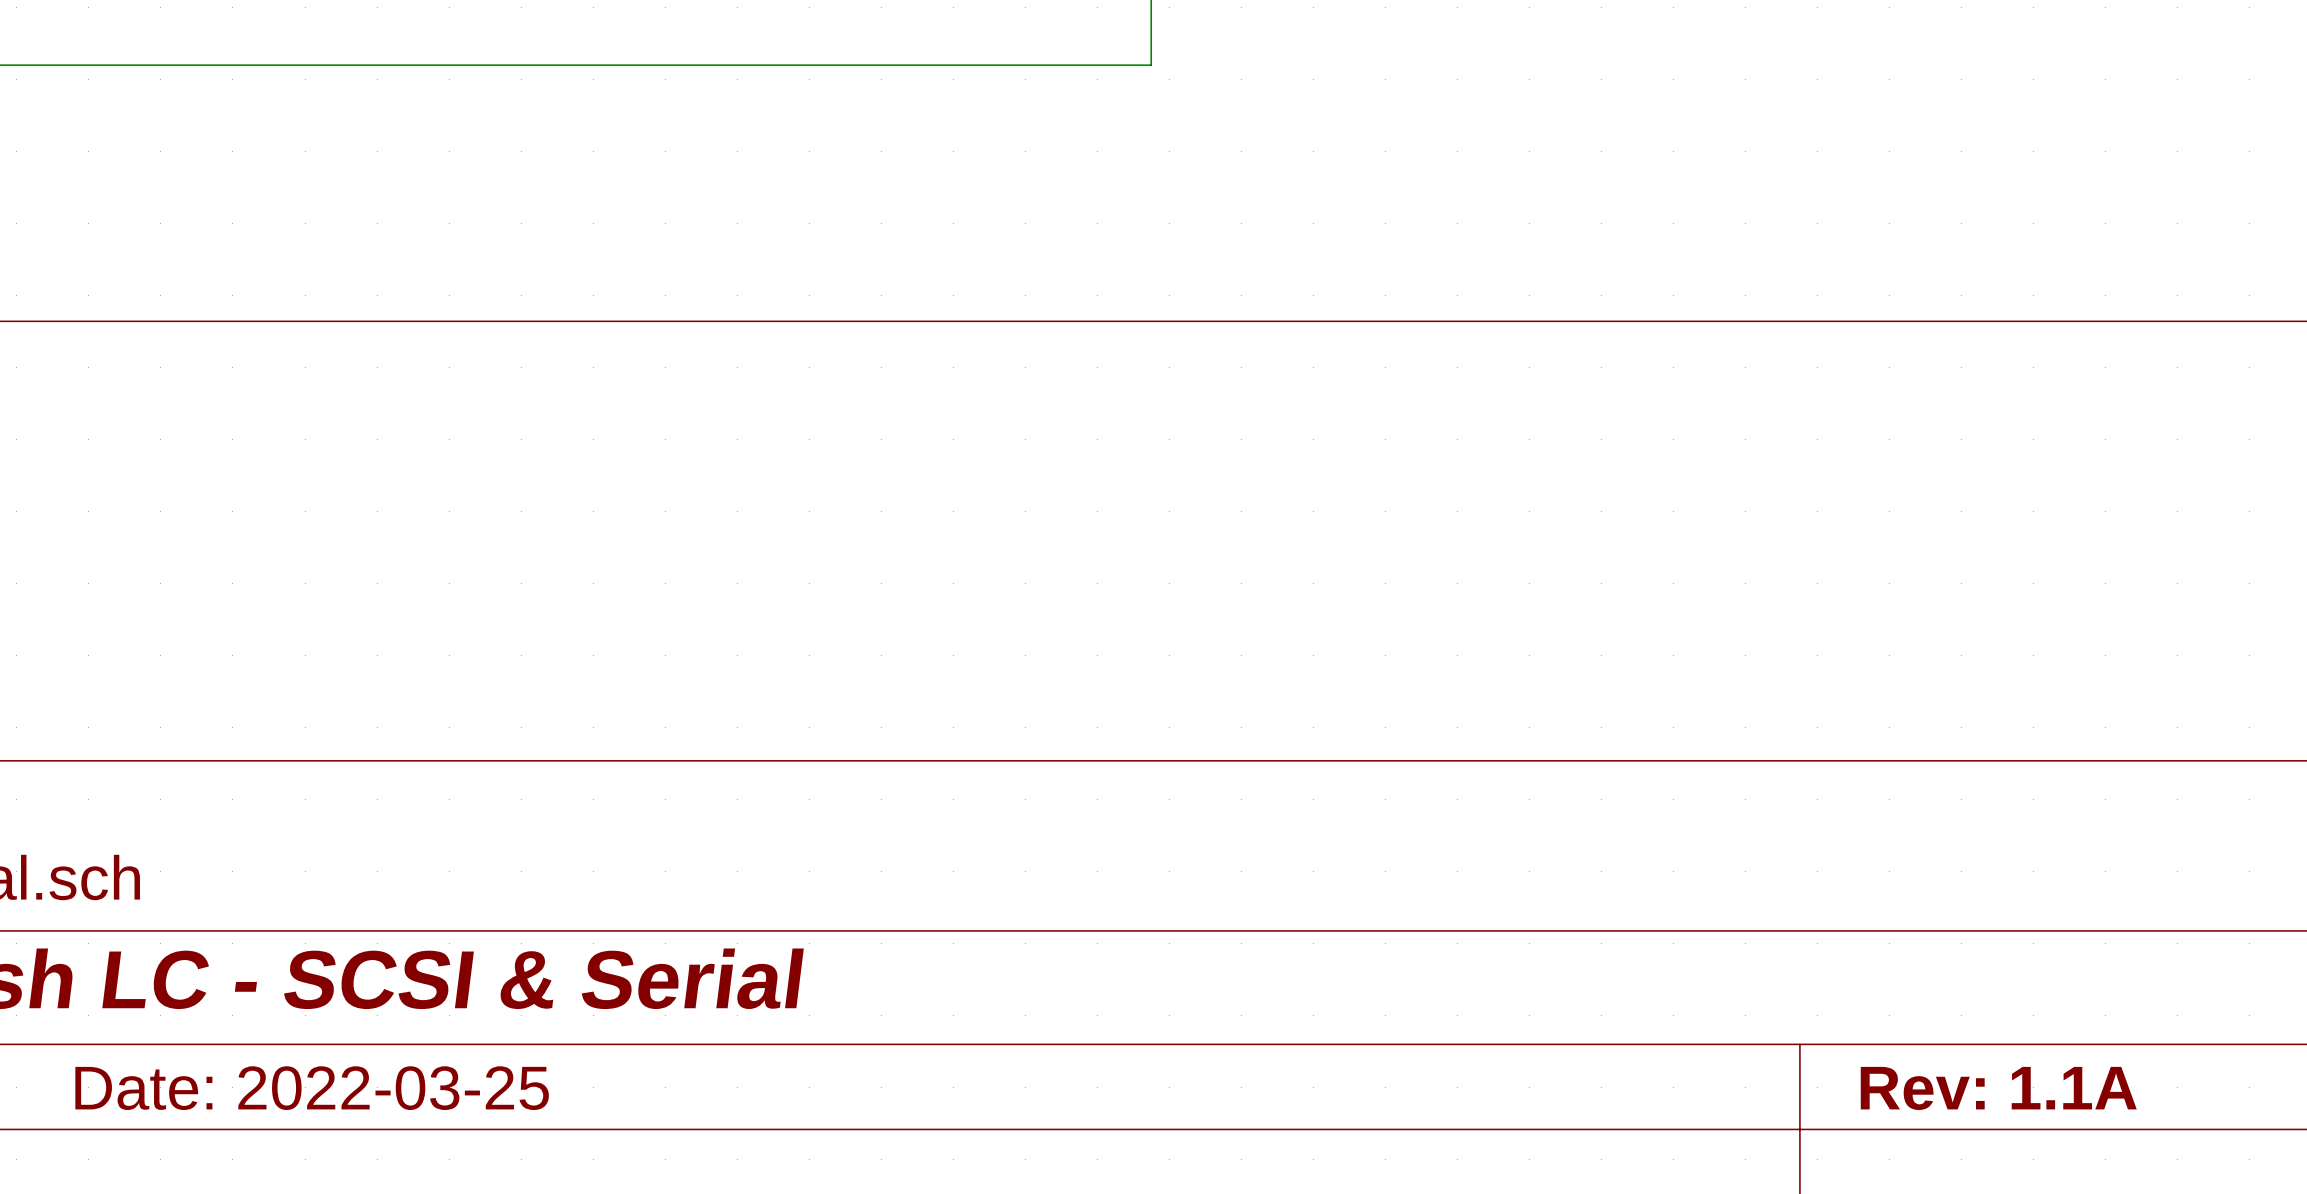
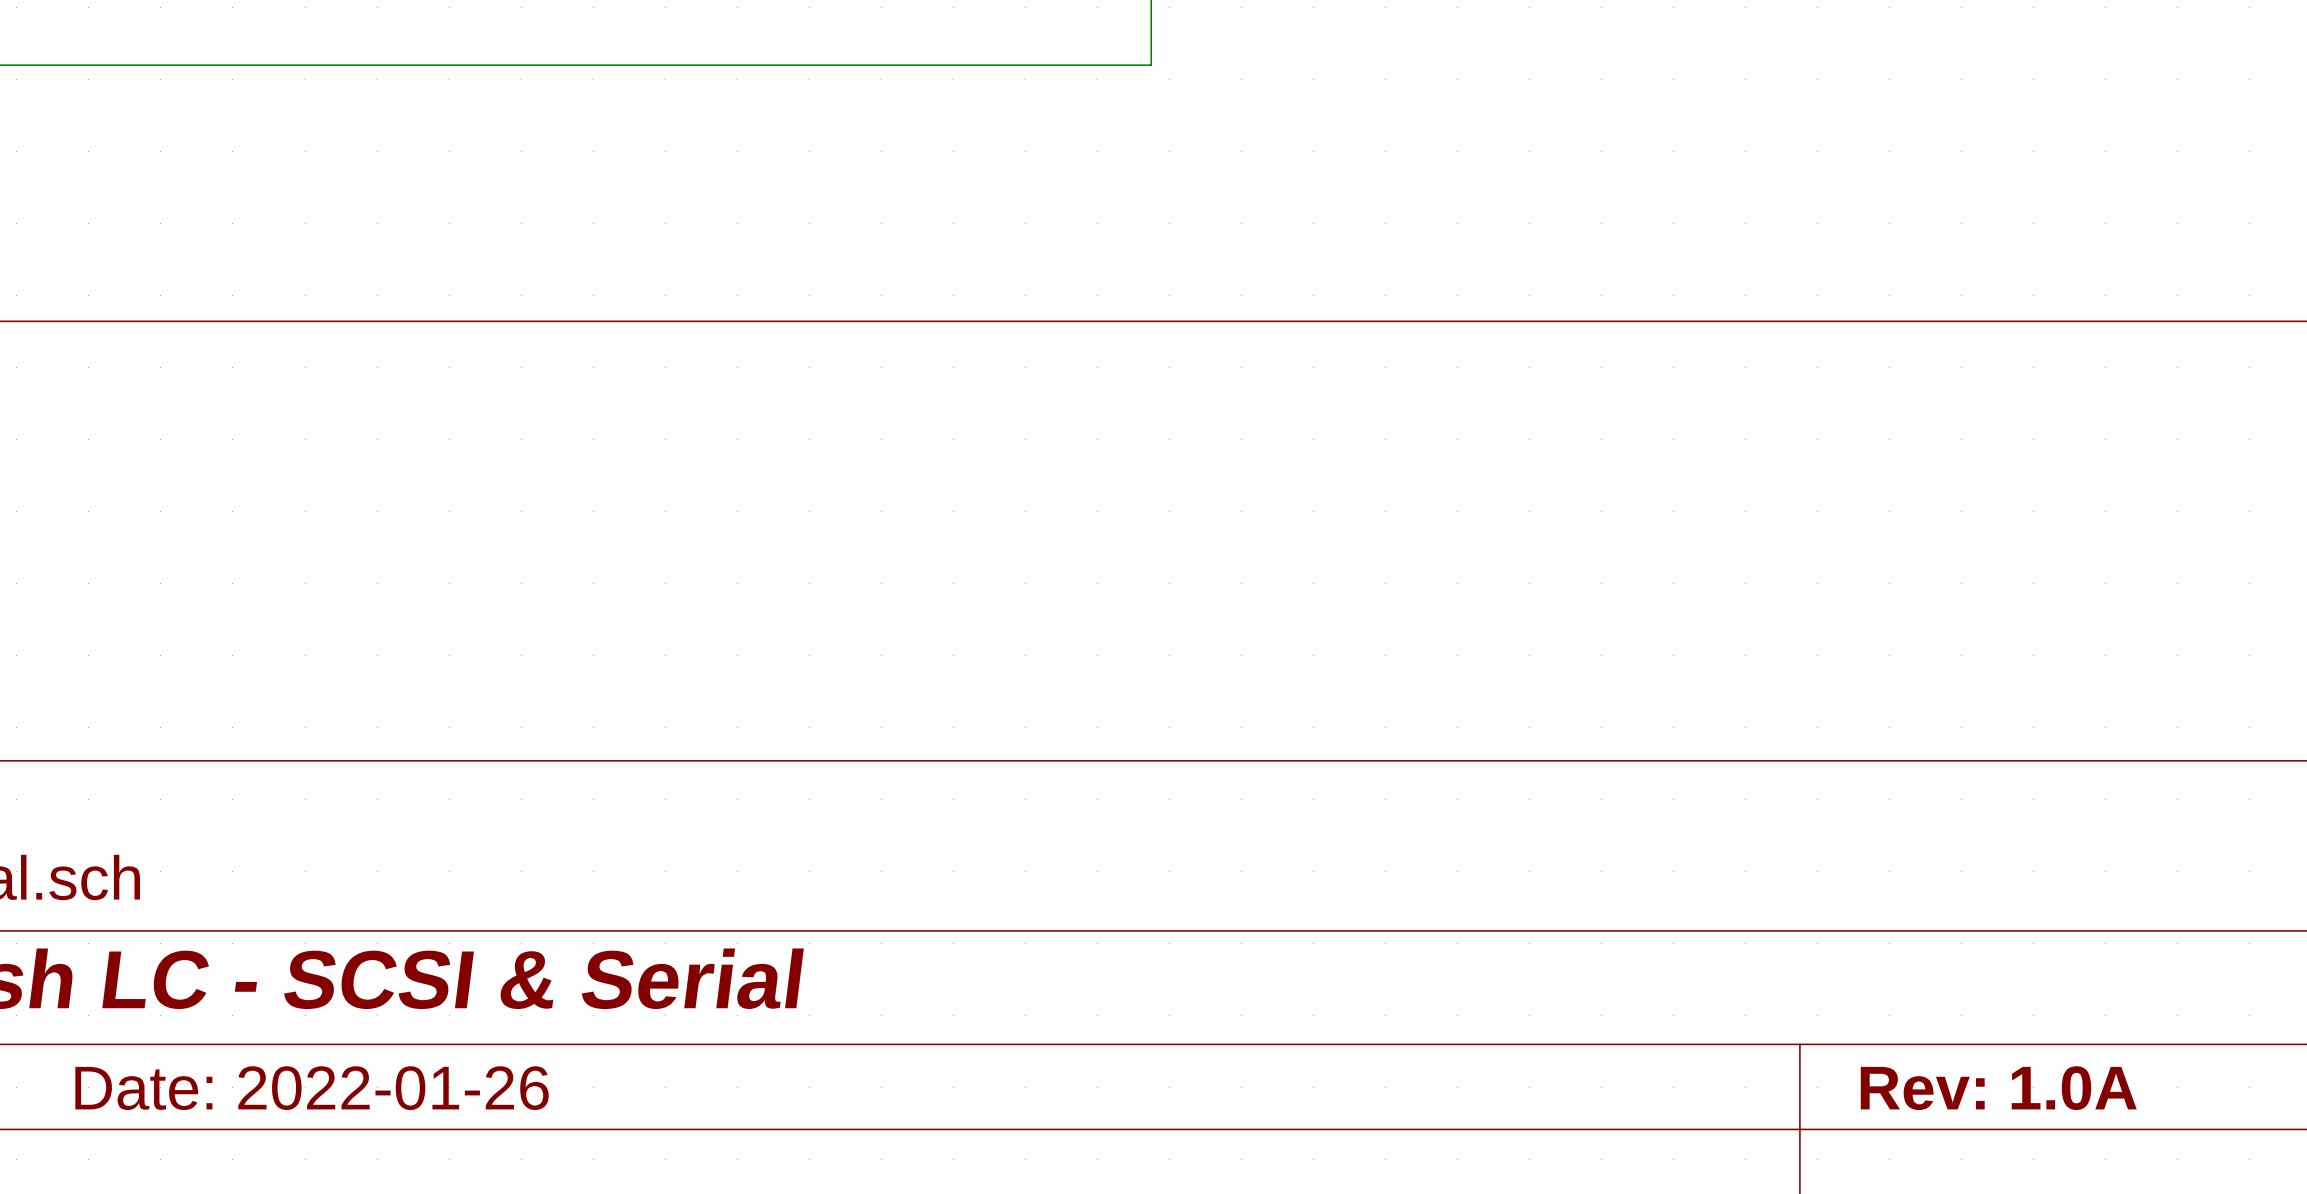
title block: Date: 2022-03-25 (312, 1088) -> Date: 2022-01-26 (312, 1088)
title block: Rev: 1.1A (1998, 1088) -> Rev: 1.0A (1998, 1088)

